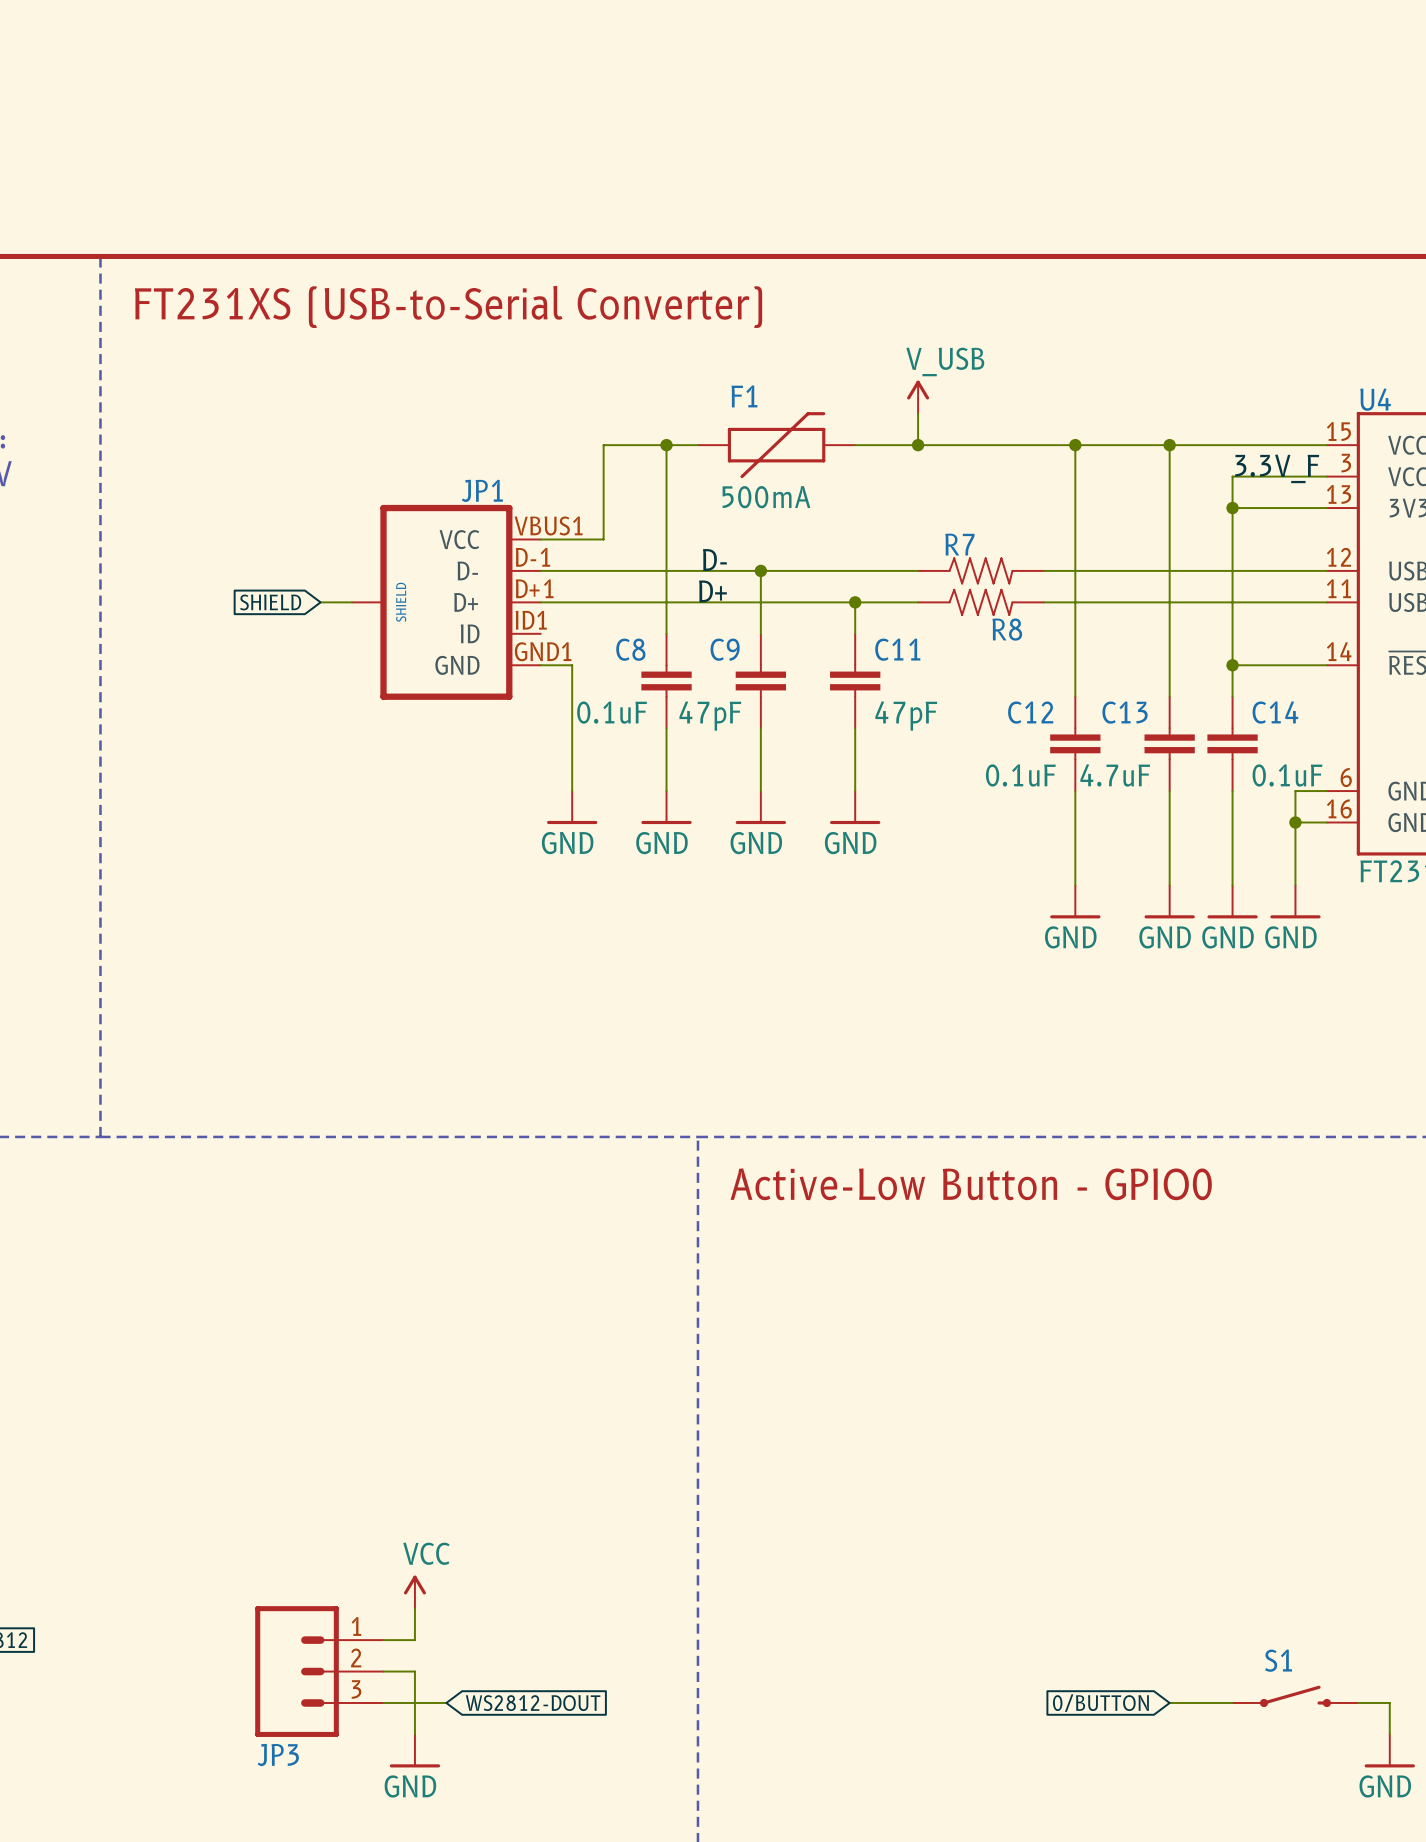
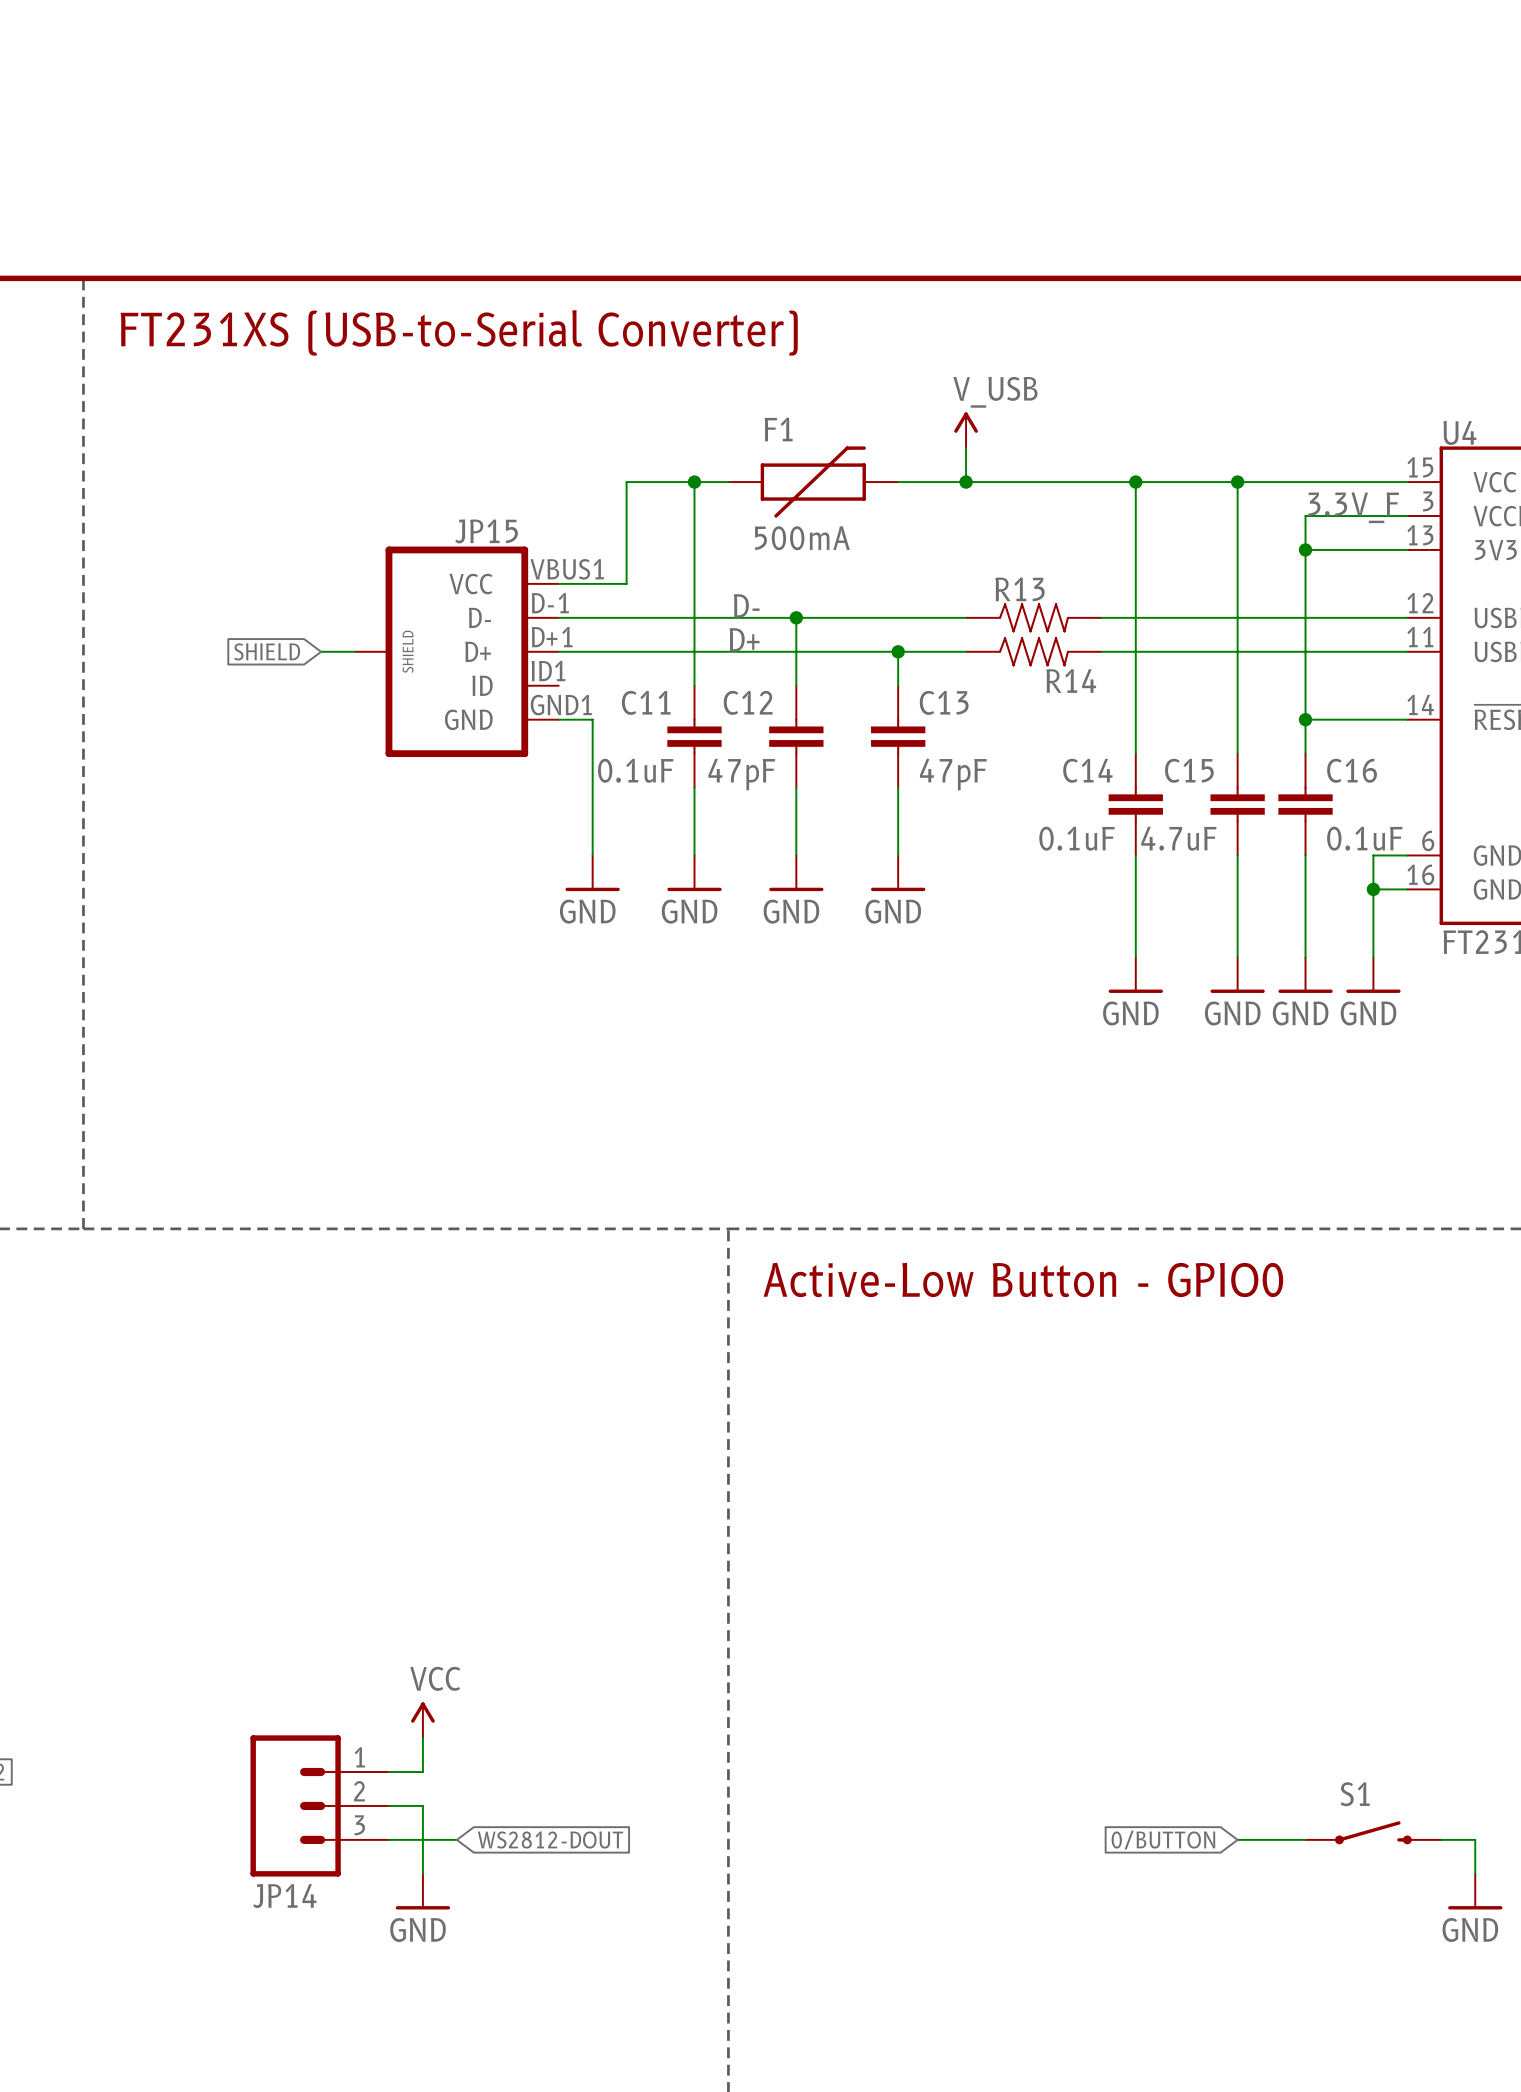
JP1 name: JP1 (482, 490) -> JP15 (486, 531)
R7 name: R7 (959, 544) -> R13 (1020, 589)
R8 name: R8 (1007, 629) -> R14 (1071, 680)
C8 name: C8 (630, 649) -> C11 (646, 702)
C9 name: C9 (725, 649) -> C12 (748, 702)
C11 name: C11 (897, 649) -> C13 (944, 702)
C12 name: C12 (1030, 712) -> C14 (1087, 770)
C13 name: C13 (1125, 712) -> C15 (1189, 770)
C14 name: C14 (1275, 712) -> C16 (1352, 770)
JP3 name: JP3 (278, 1755) -> JP14 (284, 1896)

